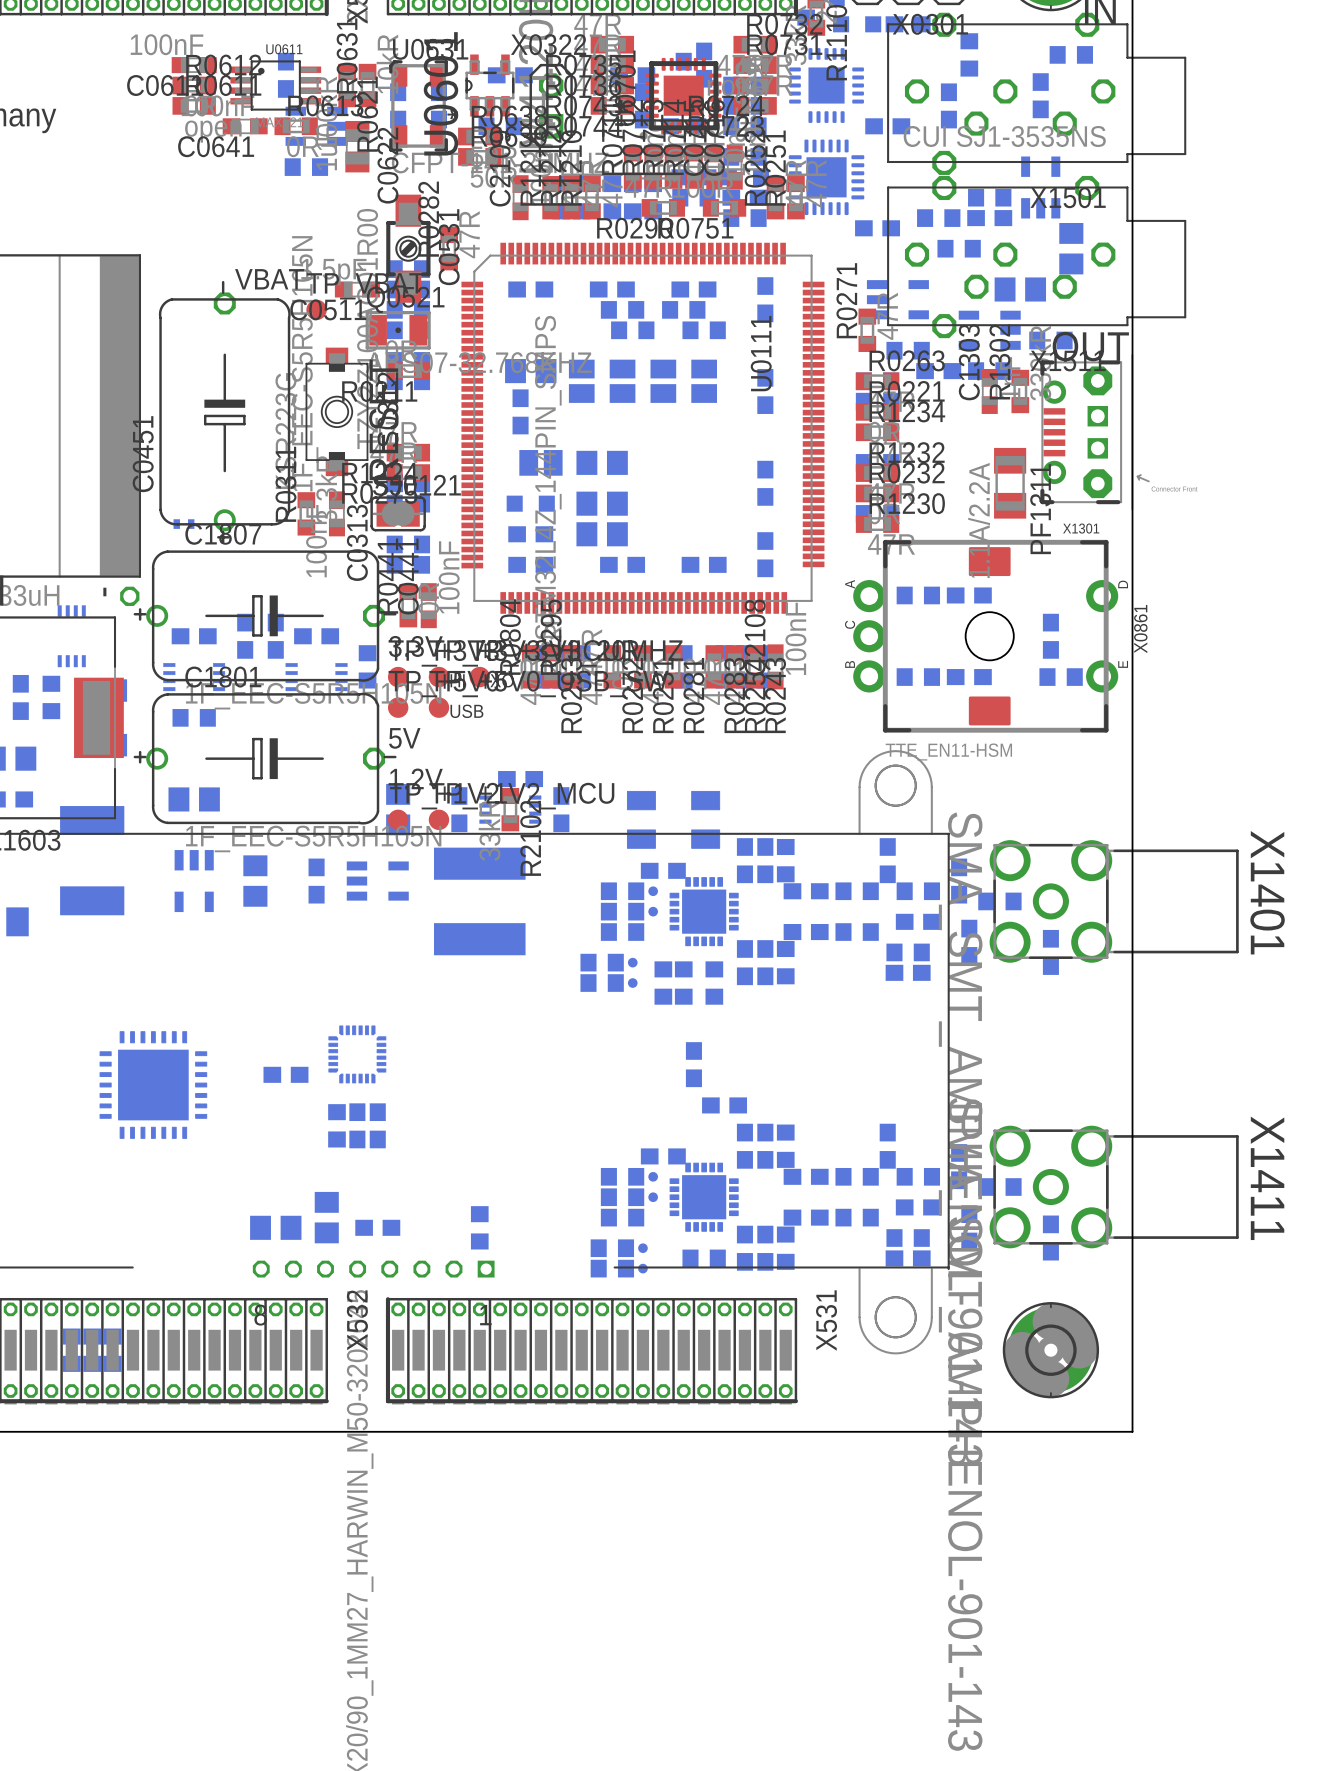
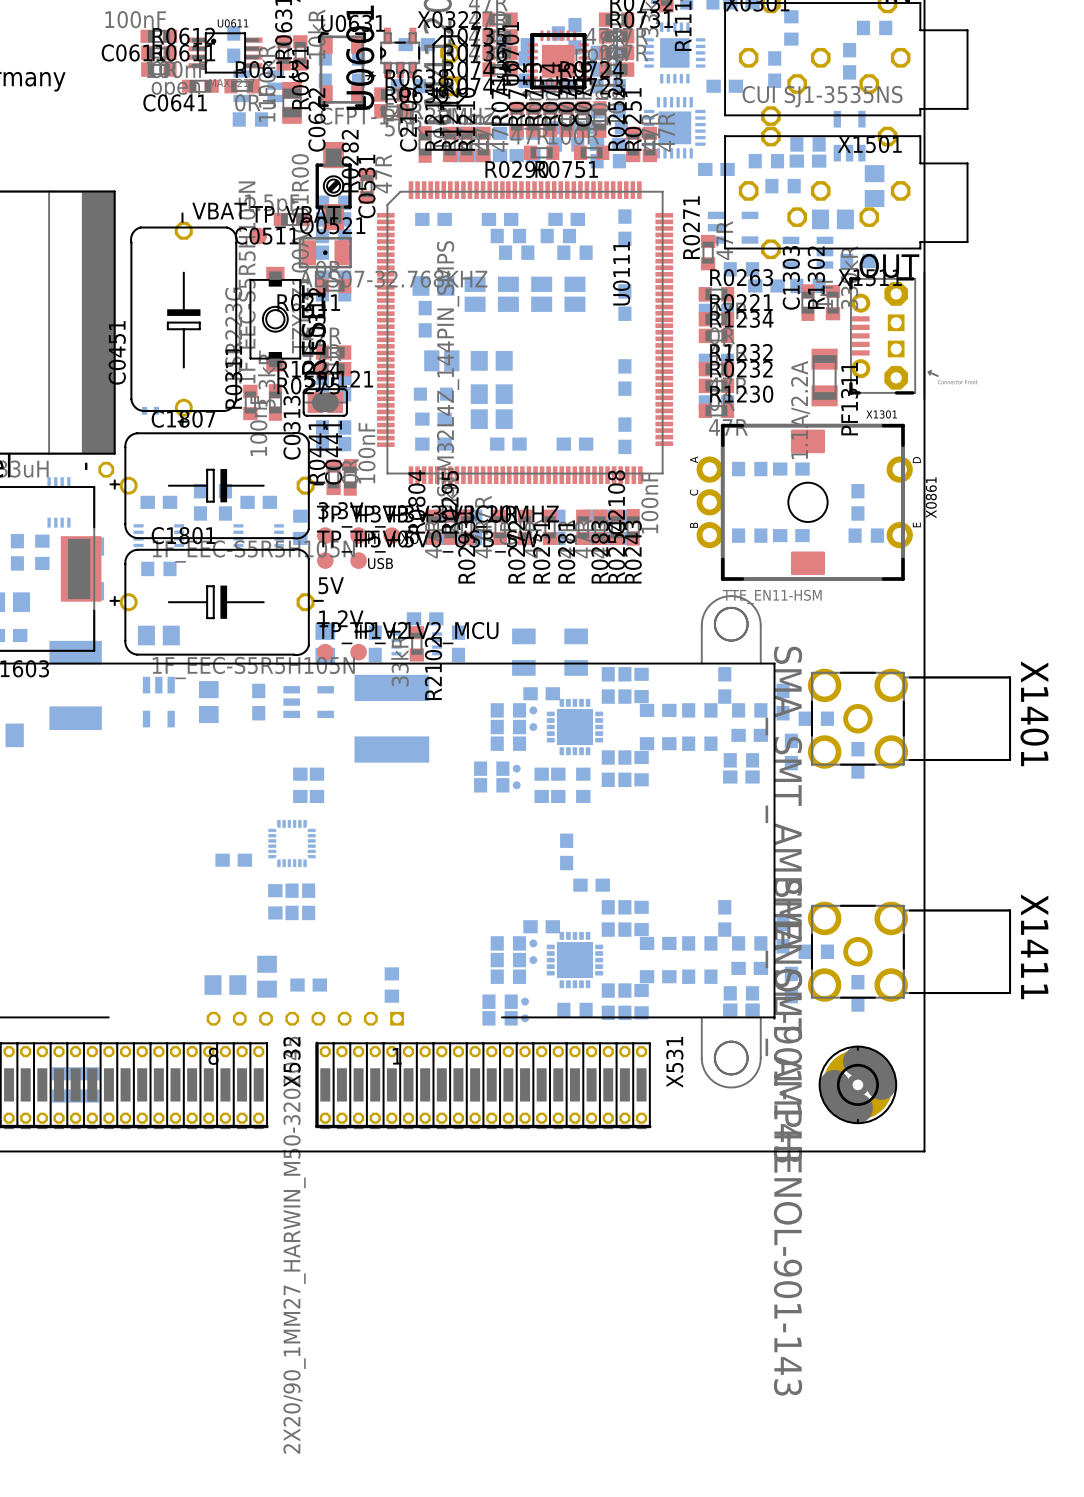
part: none -> (300, 785)
part: none -> (316, 785)
part: (153, 1085) -> none

